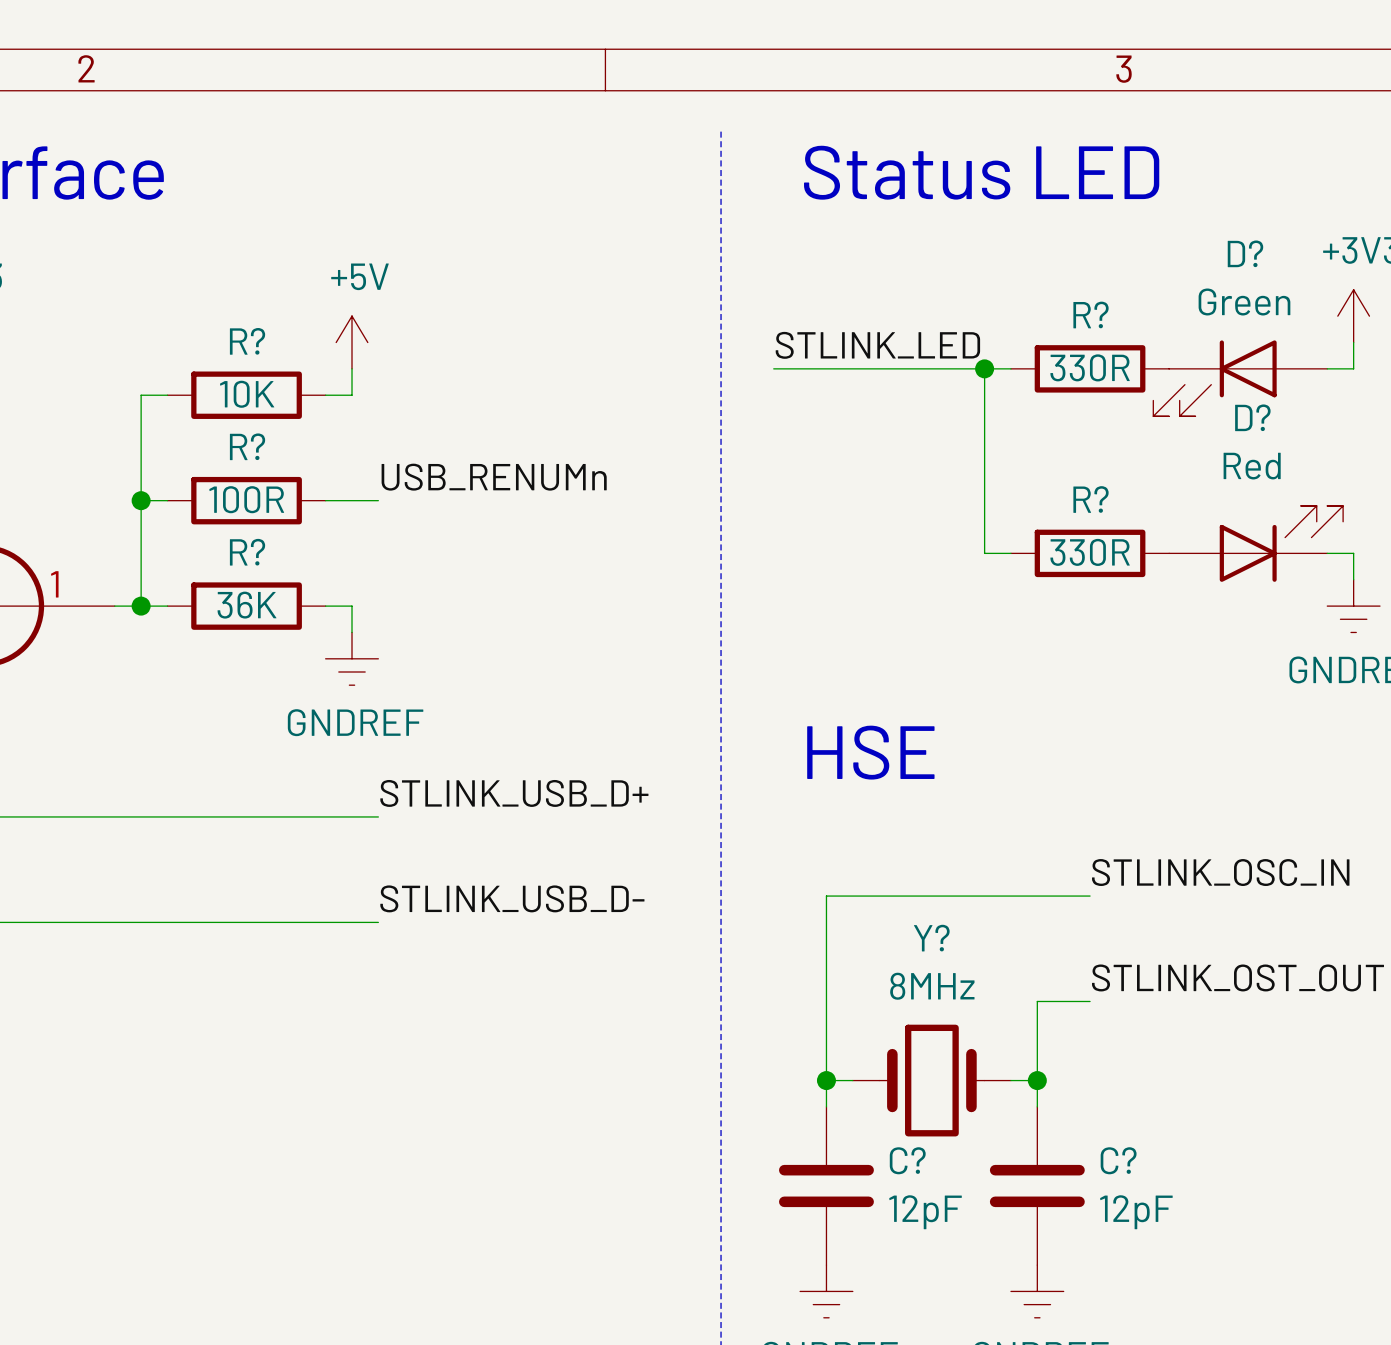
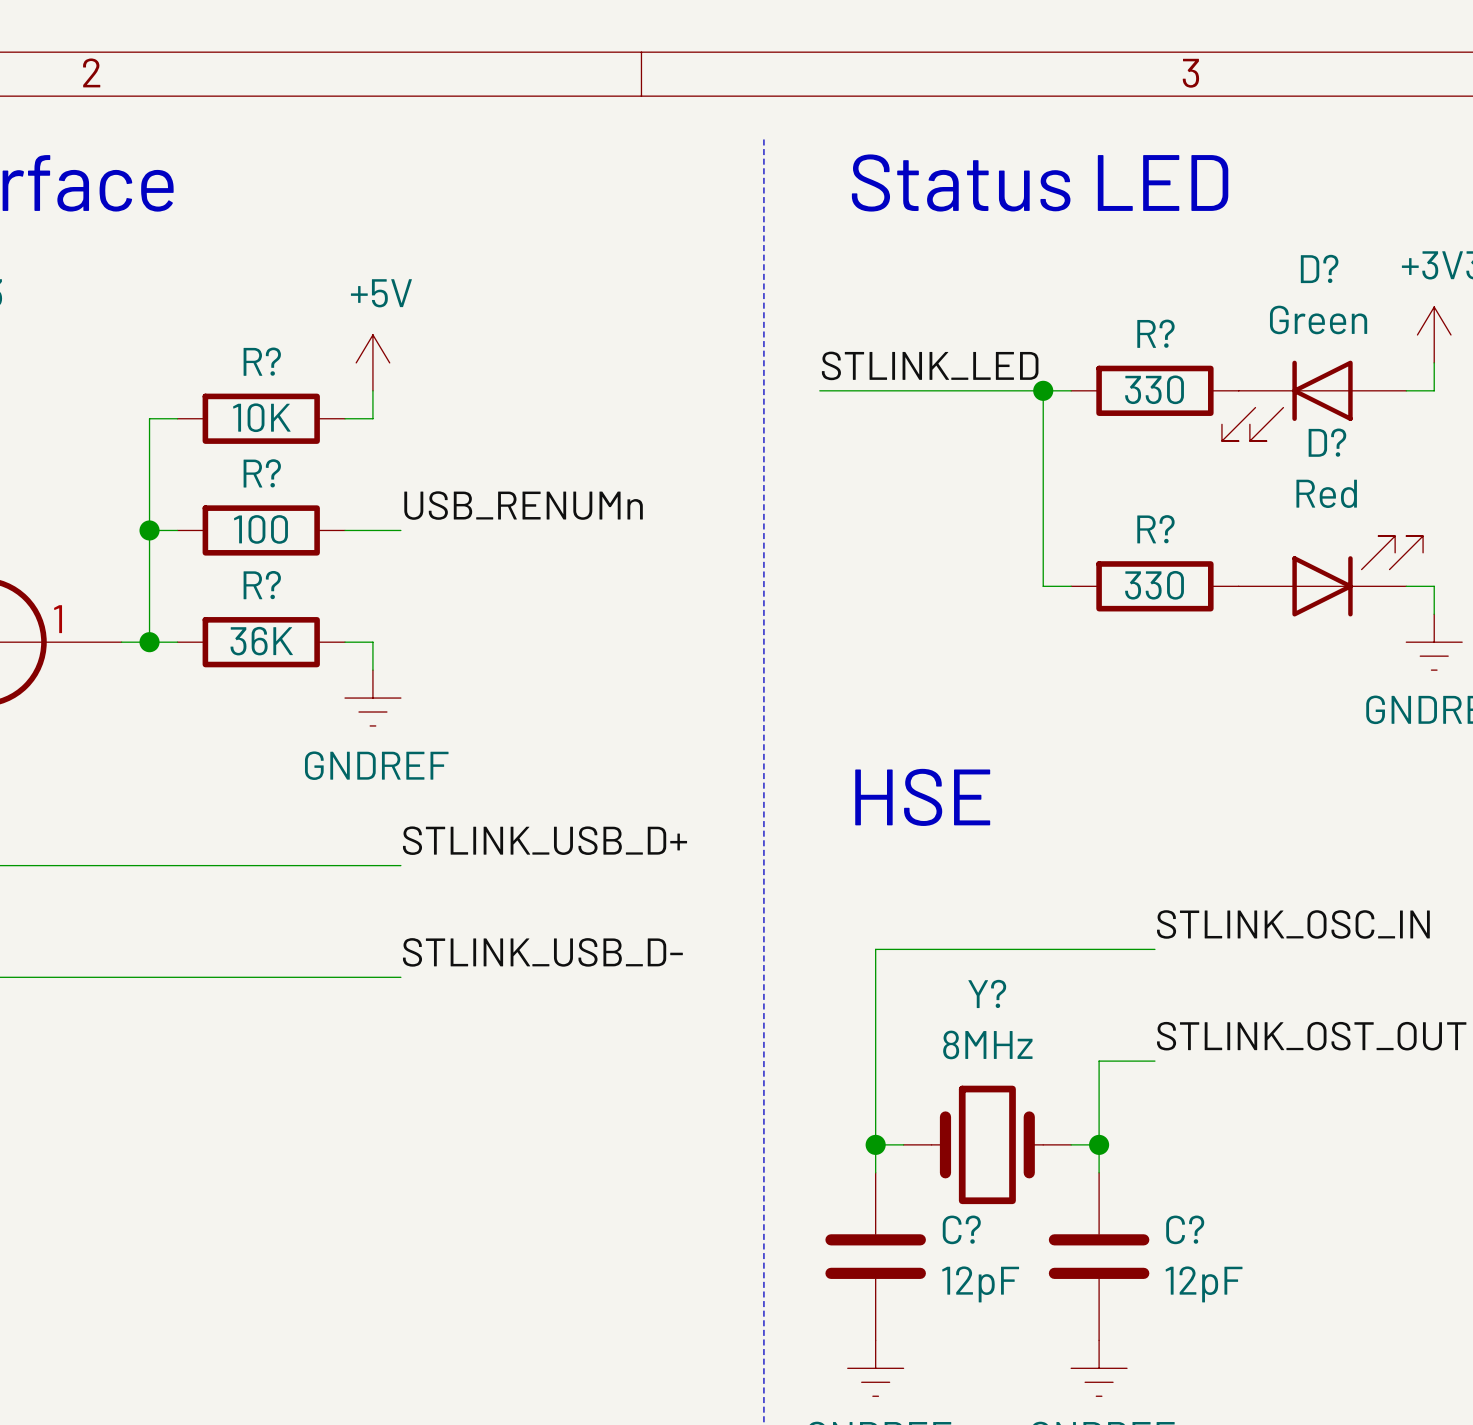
R? value: 330R (1090, 367) -> 330 (1154, 389)
R? value: 100R (246, 499) -> 100 (260, 529)
R? value: 330R (1090, 552) -> 330 (1154, 585)

